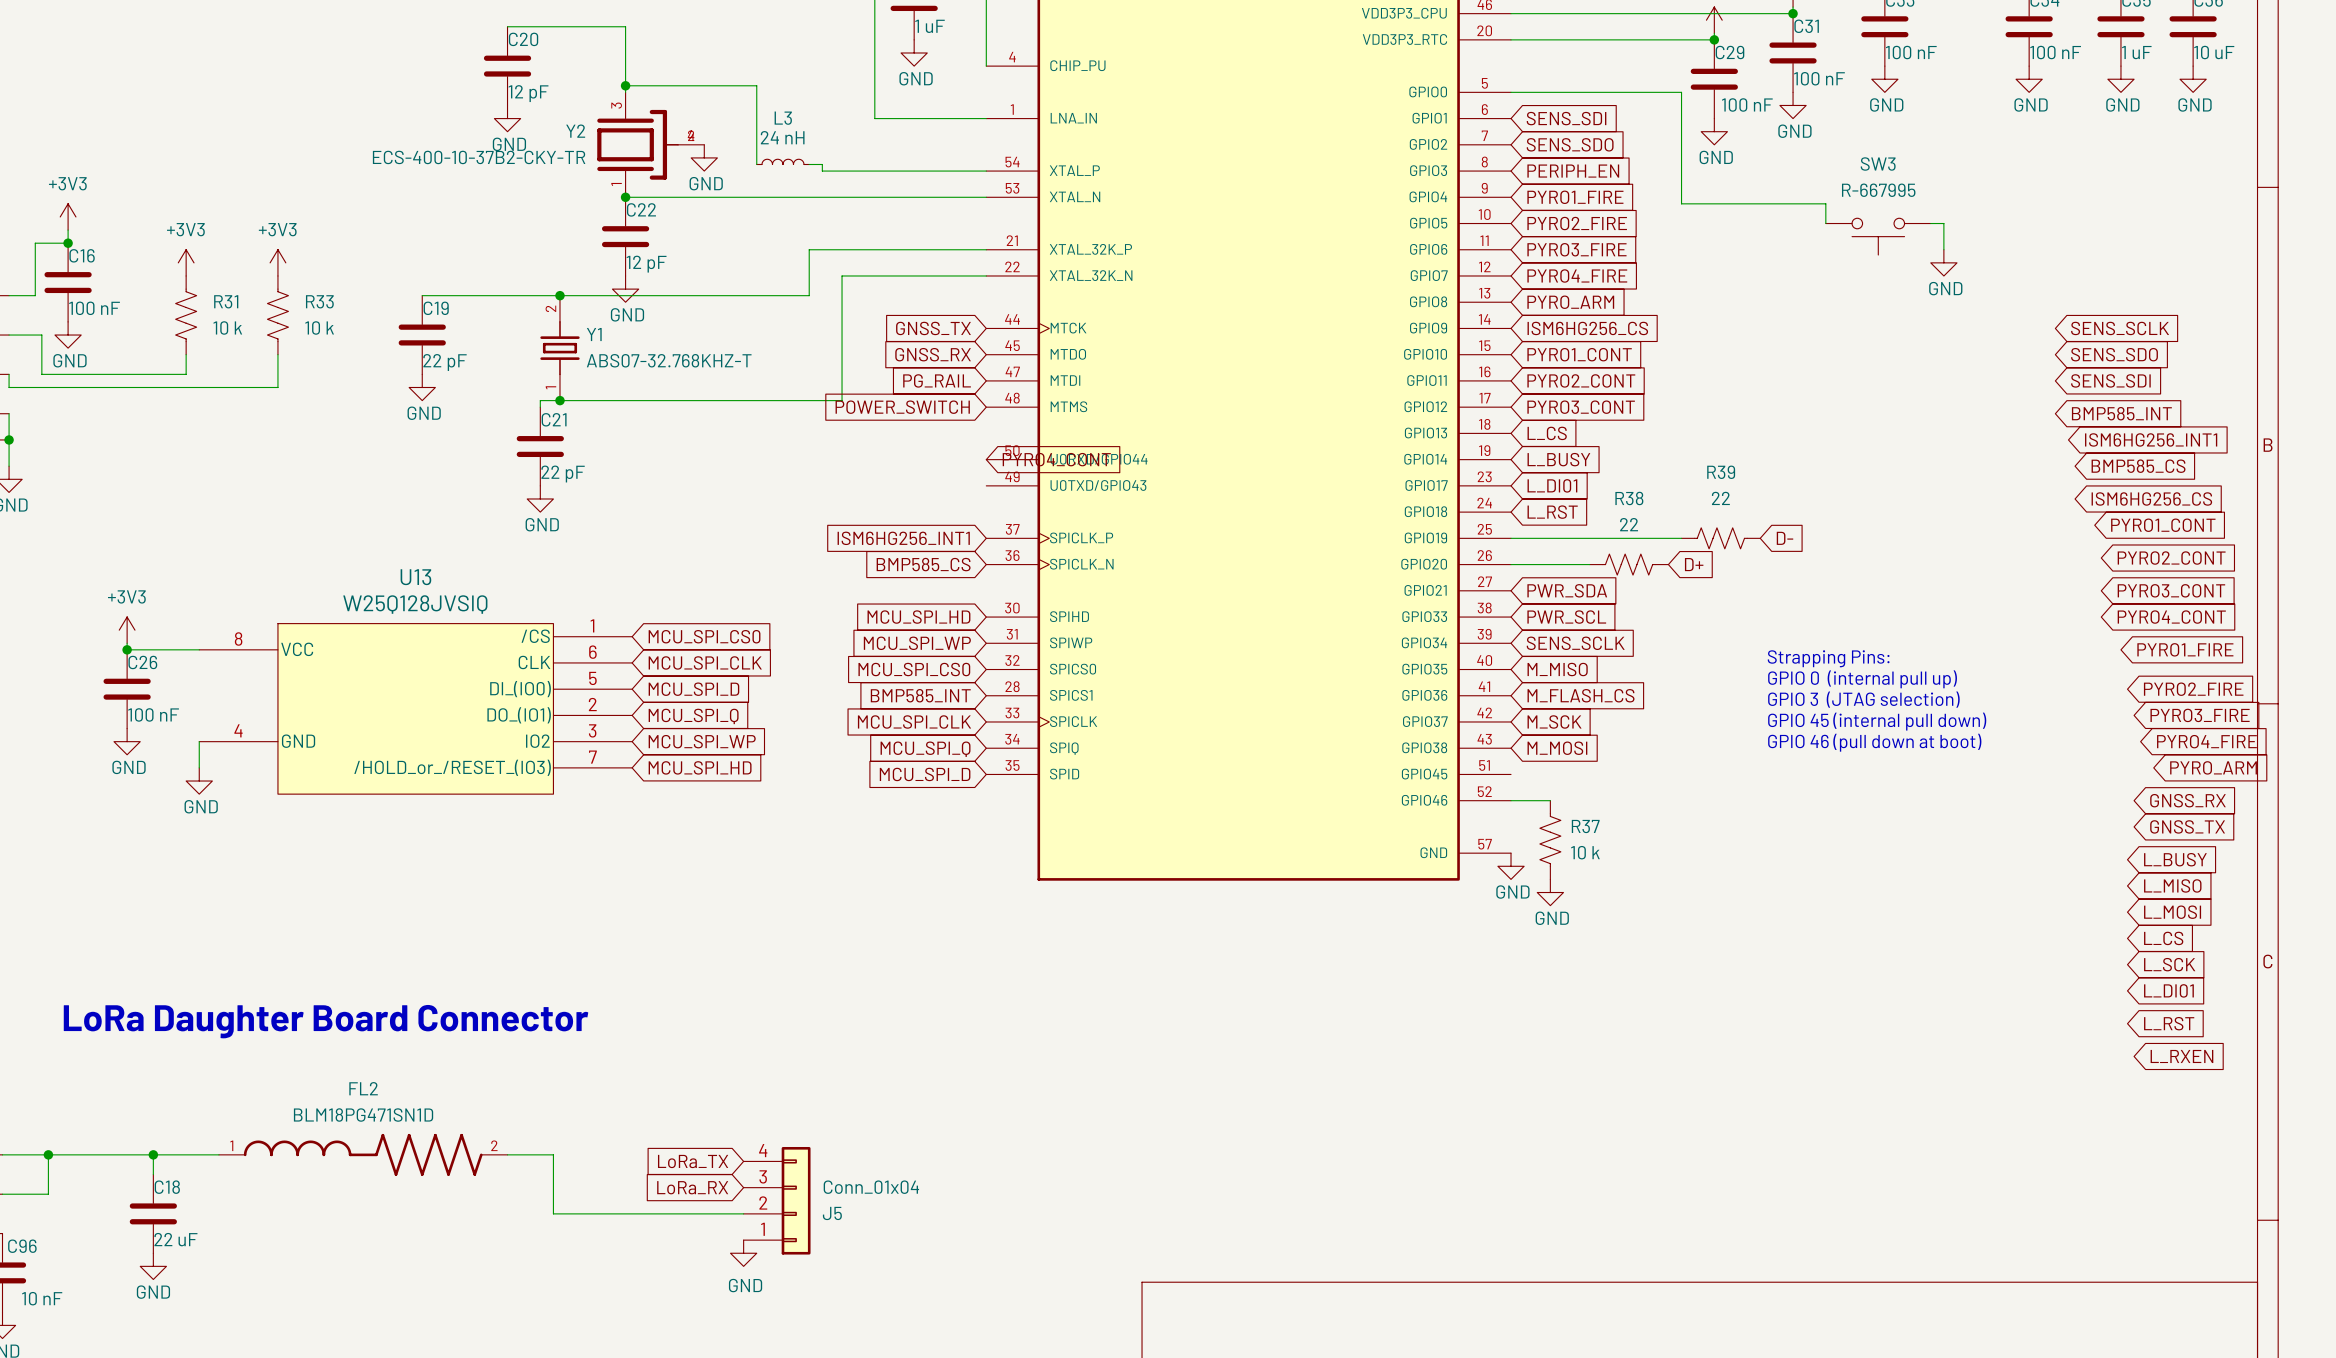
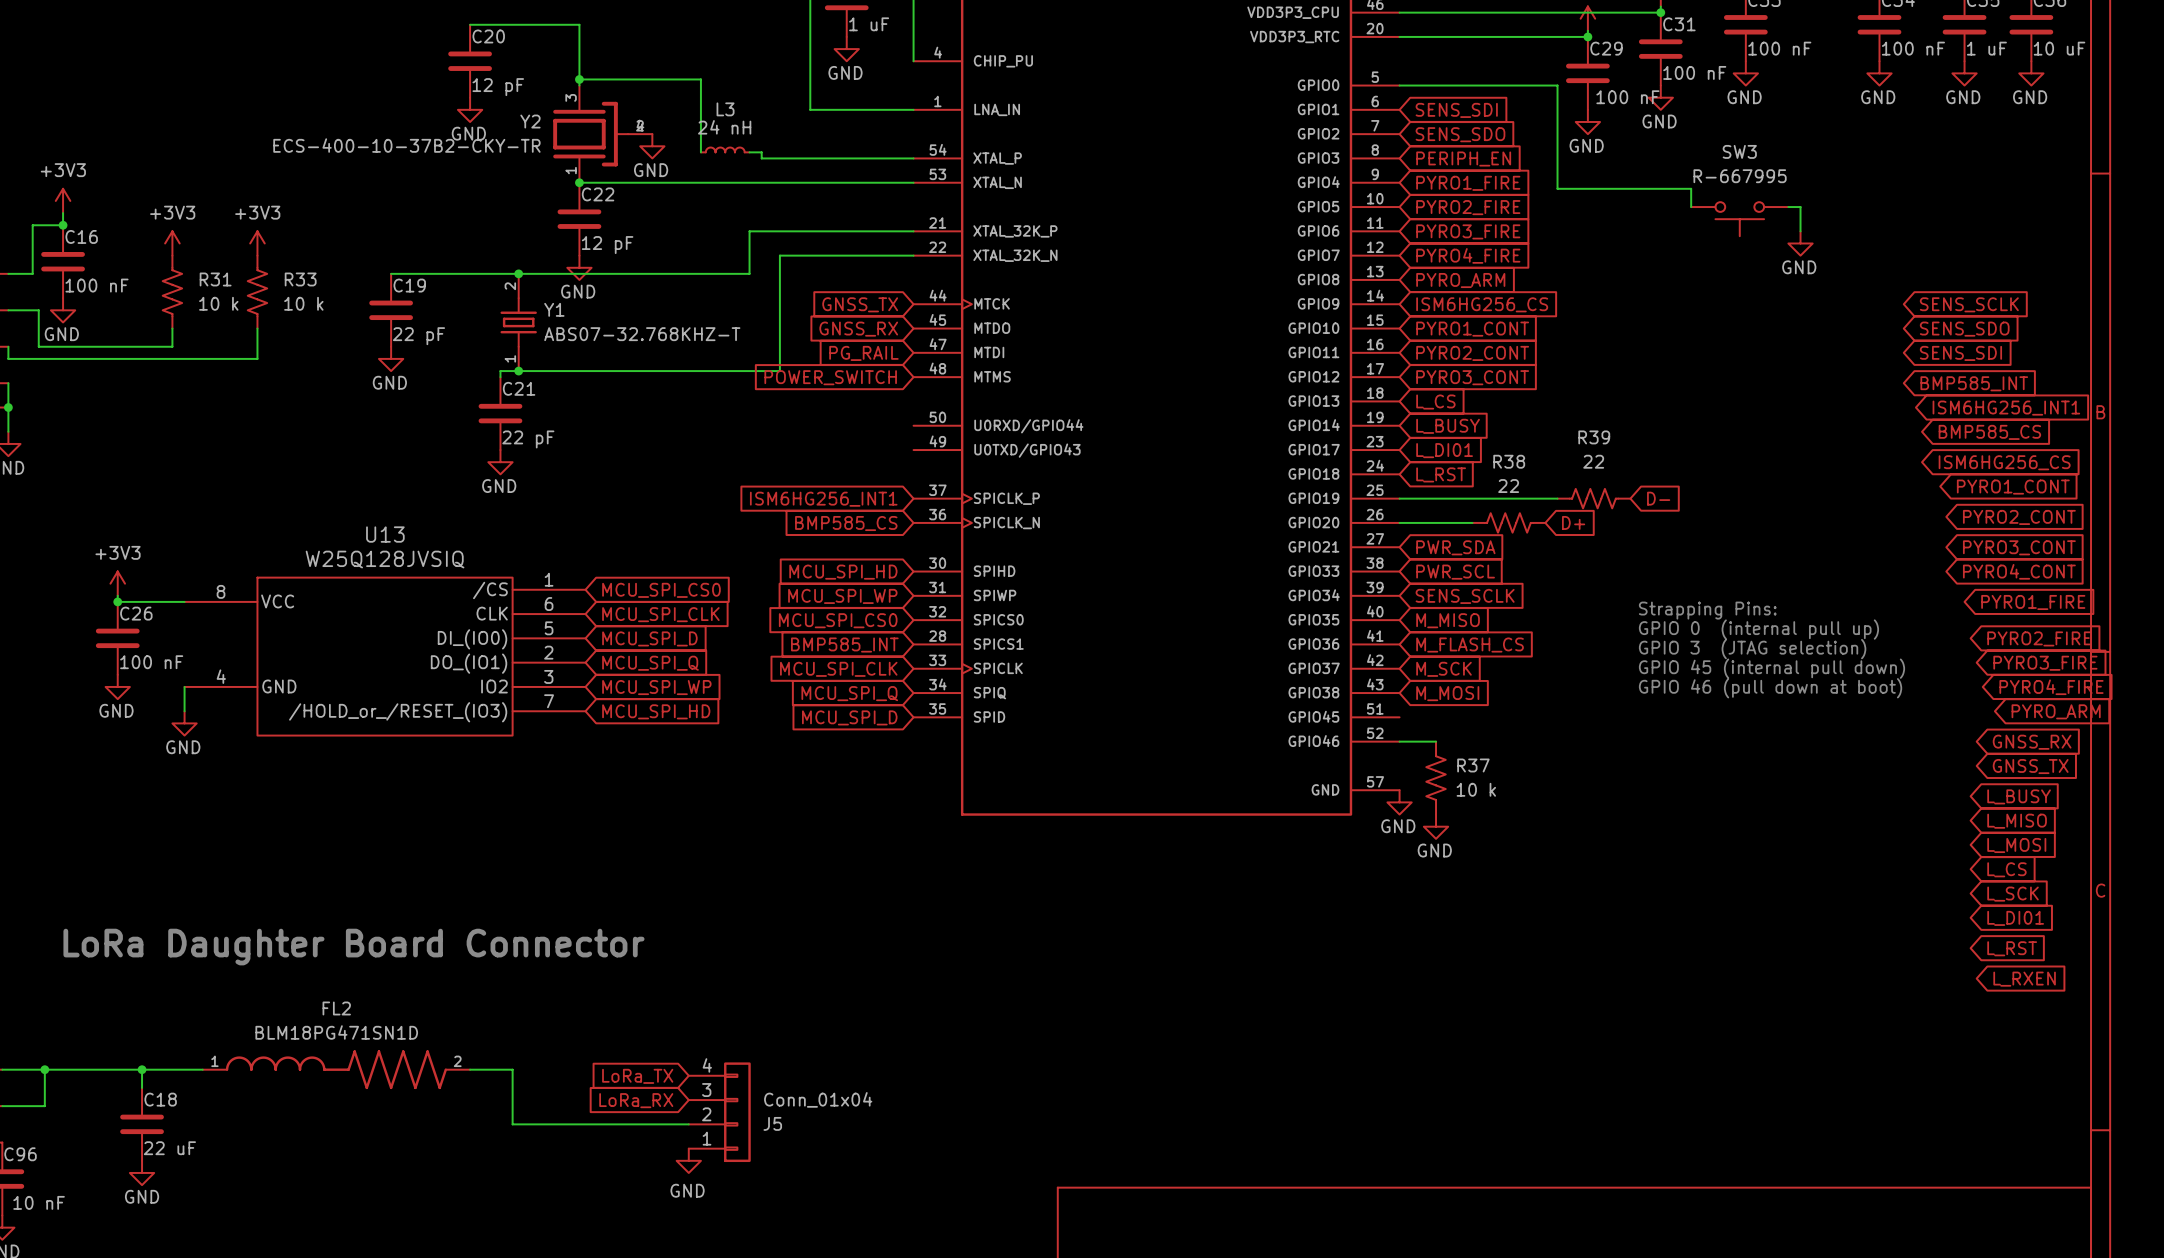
global label: PYRO4_CONT (1056, 459) -> none

